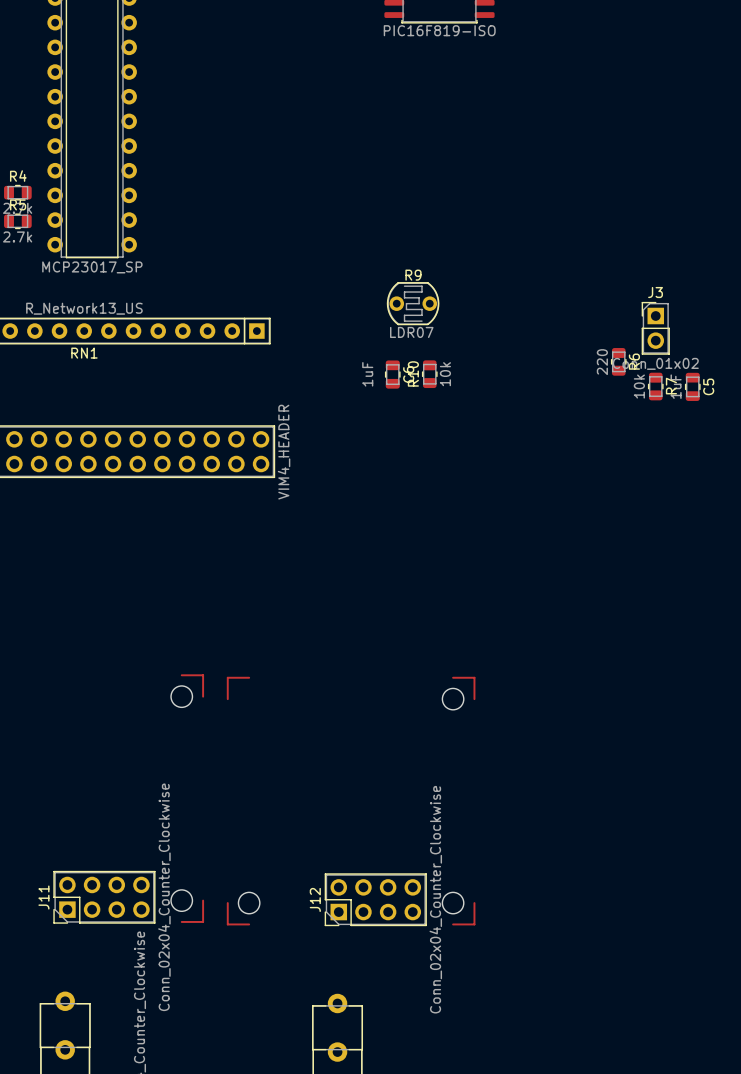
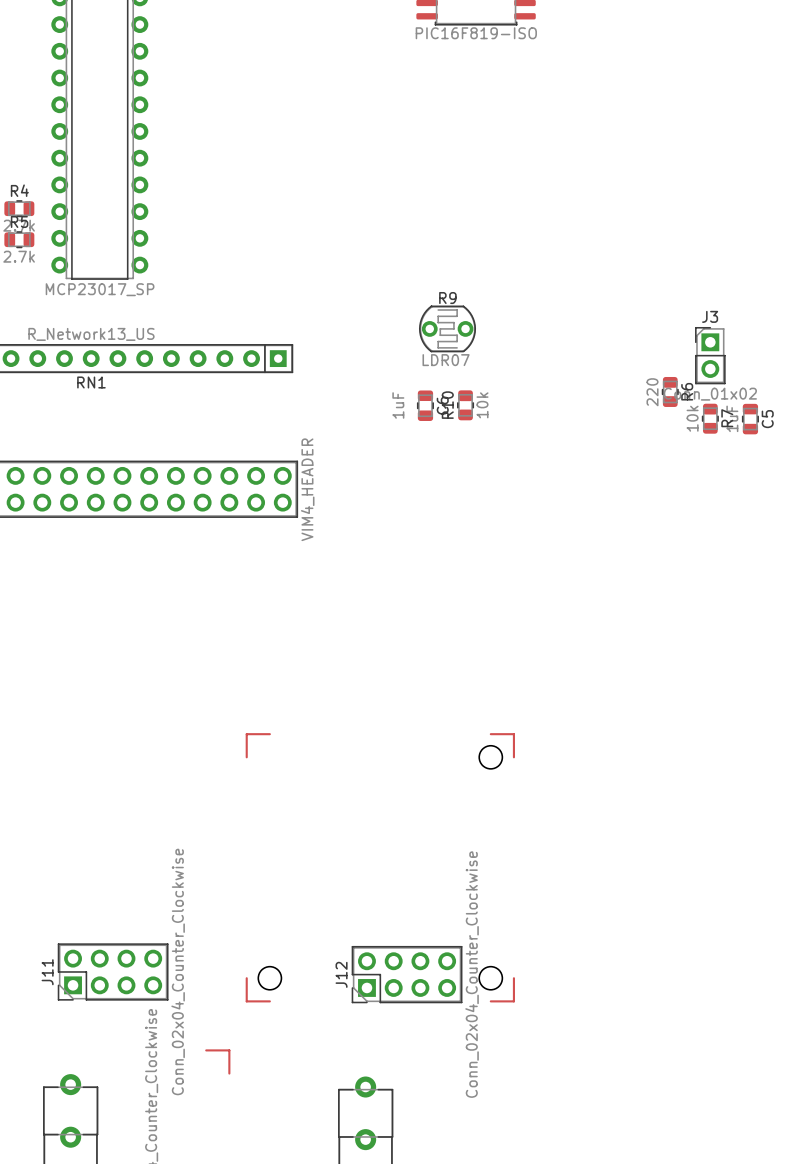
track: (181, 675) (203, 675) (203, 696) -> none
round board edge: [170, 685, 193, 708] -> none
round board edge: [170, 889, 193, 912] -> none
track: (203, 900) (203, 921) (181, 921) -> none
track: none -> (206, 1050) (229, 1050) (229, 1073)

